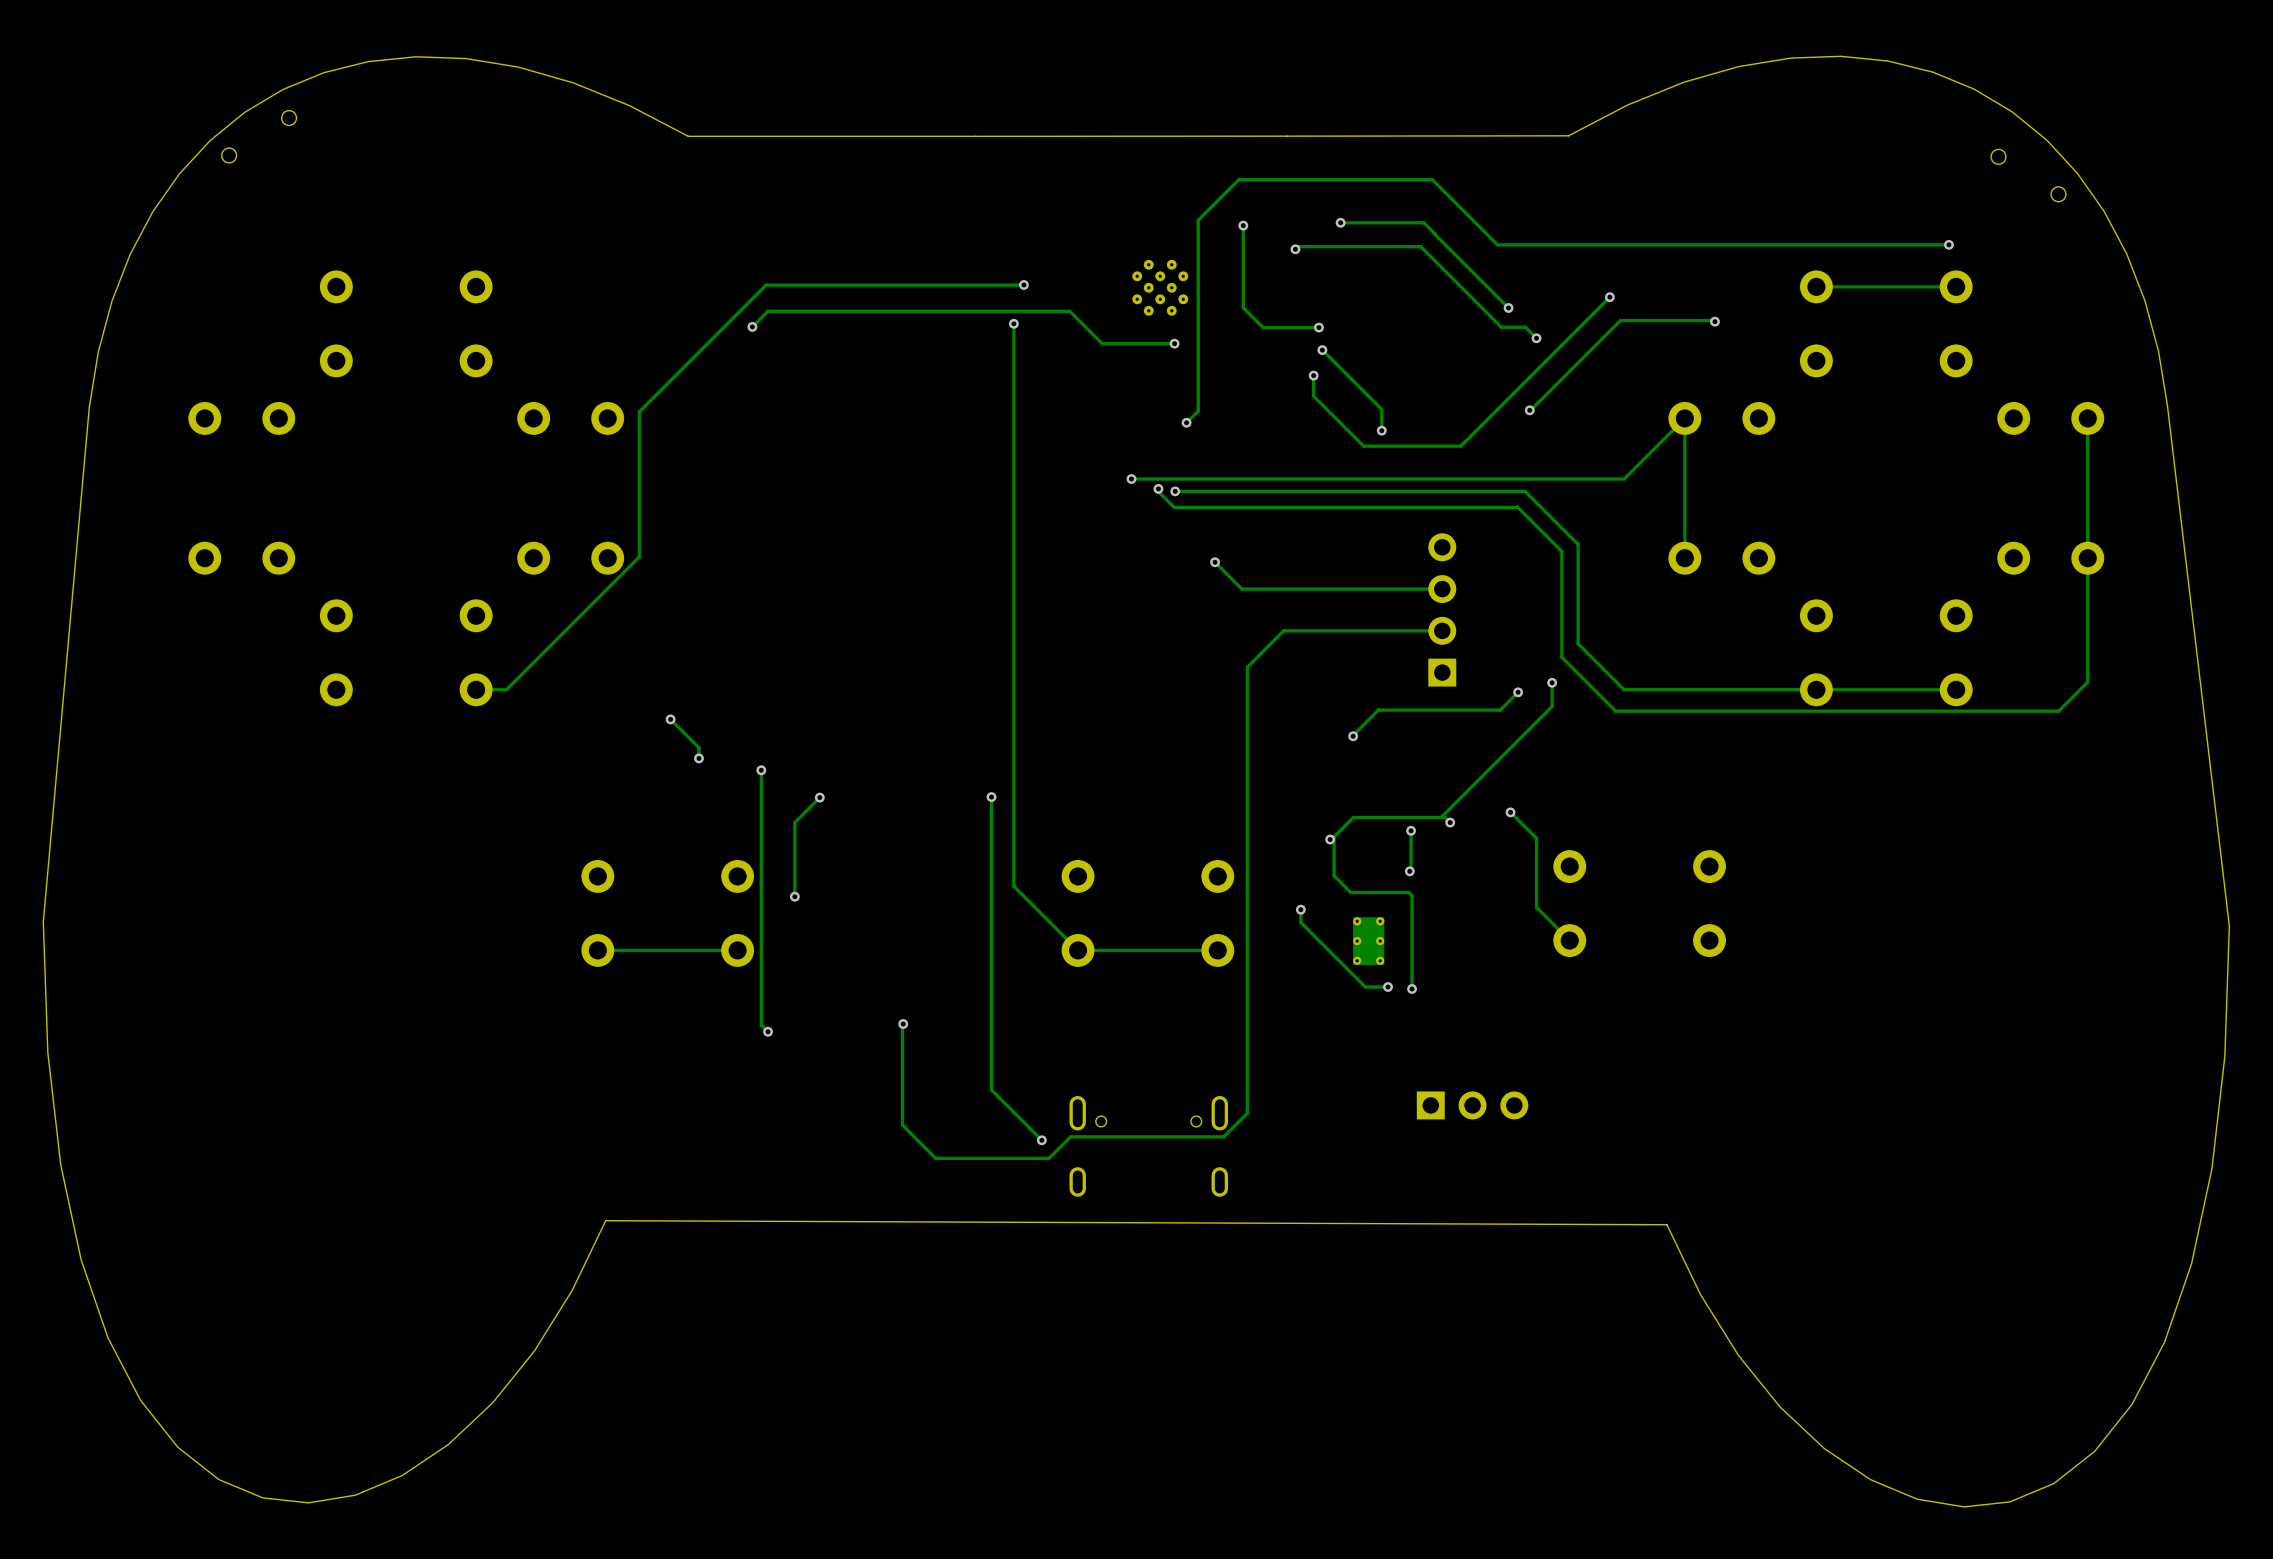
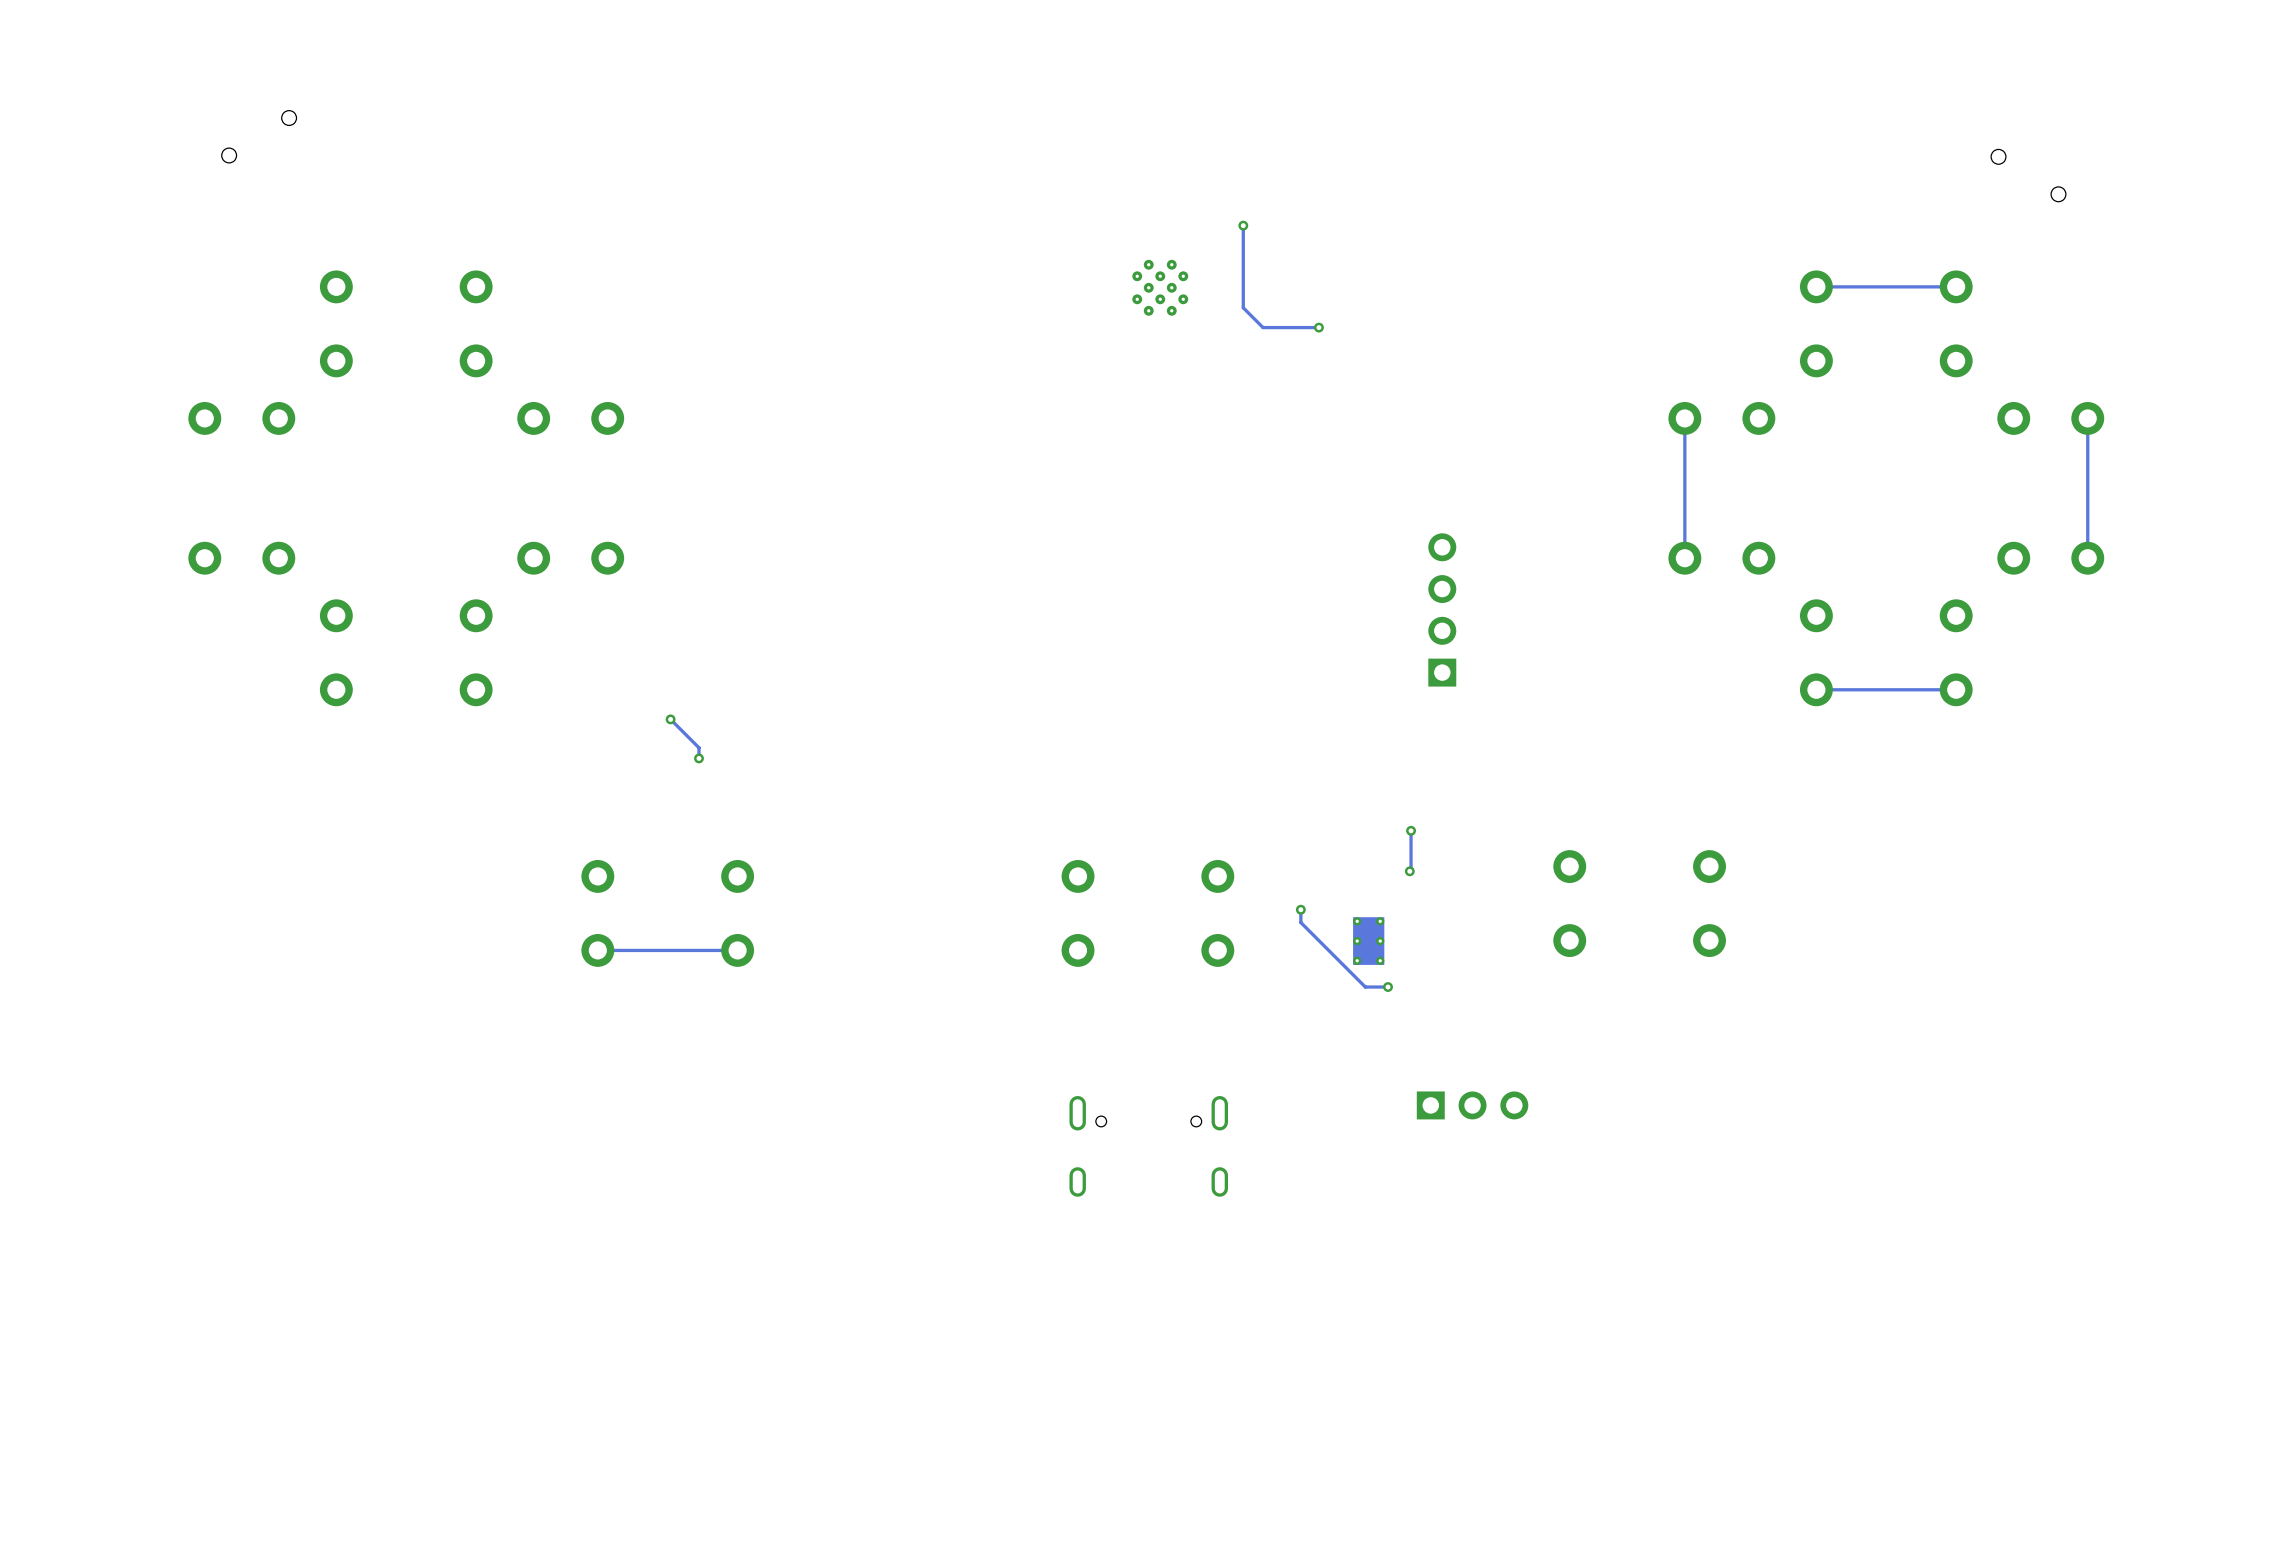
board edge: (1568, 135) (688, 136) (629, 105) (572, 82) (518, 67) (465, 58) (415, 56) (368, 61) (324, 72) (282, 89) (244, 112) (210, 140) (179, 173) (152, 211) (130, 254) (111, 301) (98, 352) (89, 406) (43, 922) (47, 1052) (60, 1164) (81, 1259) (108, 1337) (140, 1400) (177, 1447) (218, 1479) (262, 1497) (308, 1502) (355, 1495) (402, 1475) (448, 1444) (492, 1402) (534, 1351) (572, 1290) (605, 1220) (1666, 1224) (1700, 1294) (1738, 1355) (1780, 1406) (1824, 1448) (1870, 1479) (1917, 1499) (1964, 1506) (2009, 1501) (2053, 1483) (2094, 1451) (2132, 1404) (2164, 1341) (2191, 1263) (2211, 1168) (2224, 1056) (2229, 926) (2167, 406) (2158, 351) (2144, 300) (2126, 253) (2104, 211) (2077, 173) (2046, 139) (2012, 111) (1974, 89) (1932, 72) (1888, 61) (1841, 56) (1791, 58) (1738, 66) (1683, 82) (1627, 105) (1568, 135) -> none
track: (1340, 222) (1424, 222) (1508, 308) -> none
via: (1340, 222) -> none
track: (1948, 244) (1497, 244) (1432, 179) (1238, 179) (1198, 220) (1198, 411) (1186, 422) -> none
via: (1948, 244) -> none
track: (1295, 249) (1298, 246) (1420, 246) (1501, 327) (1525, 327) (1536, 338) -> none
via: (1295, 249) -> none
via: (1023, 284) -> none
track: (1023, 285) (766, 285) (639, 411) (639, 556) (506, 689) (476, 689) -> none
track: (1609, 297) (1460, 446) (1363, 446) (1313, 396) (1313, 375) -> none
via: (1609, 297) -> none
via: (1508, 308) -> none
track: (1714, 321) (1620, 320) (1529, 410) -> none
via: (1714, 321) -> none
track: (1013, 323) (1013, 886) (1078, 950) (1217, 950) -> none
via: (1013, 323) -> none
track: (752, 326) (768, 311) (1069, 311) (1102, 343) (1174, 343) -> none
via: (752, 326) -> none
via: (1536, 338) -> none
via: (1174, 343) -> none
track: (1322, 350) (1381, 409) (1381, 430) -> none
via: (1322, 350) -> none
via: (1313, 375) -> none
via: (1529, 410) -> none
track: (1684, 418) (1624, 479) (1131, 479) -> none
via: (1186, 422) -> none
via: (1381, 430) -> none
via: (1131, 479) -> none
track: (1158, 488) (1158, 491) (1174, 507) (1517, 506) (1561, 551) (1561, 657) (1615, 711) (2058, 711) (2087, 682) (2087, 558) -> none
via: (1158, 488) -> none
track: (1175, 491) (1525, 491) (1578, 544) (1578, 643) (1624, 689) (1816, 689) -> none
via: (1175, 491) -> none
track: (1215, 562) (1241, 589) (1442, 589) -> none
via: (1215, 562) -> none
track: (1442, 630) (1283, 630) (1247, 667) (1247, 1113) (1223, 1136) (1070, 1136) (1049, 1158) (935, 1158) (902, 1125) (903, 1024) -> none
track: (1552, 682) (1552, 706) (1441, 817) -> none
via: (1552, 682) -> none
track: (1518, 692) (1500, 710) (1378, 710) (1353, 736) -> none
via: (1518, 692) -> none
via: (1353, 736) -> none
track: (761, 770) (761, 1025) (768, 1031) -> none
via: (761, 770) -> none
track: (819, 797) (794, 822) (794, 896) -> none
via: (819, 797) -> none
track: (991, 797) (991, 1089) (1041, 1140) -> none
via: (991, 797) -> none
track: (1510, 812) (1536, 838) (1536, 907) (1569, 940) -> none
via: (1510, 812) -> none
track: (1450, 822) (1445, 817) (1353, 817) (1334, 836) -> none
via: (1450, 822) -> none
track: (1334, 836) (1334, 875) (1350, 892) (1408, 892) (1412, 895) (1412, 988) -> none
via: (1330, 839) -> none
via: (794, 896) -> none
via: (1412, 988) -> none
via: (903, 1024) -> none
via: (768, 1031) -> none
via: (1041, 1140) -> none

